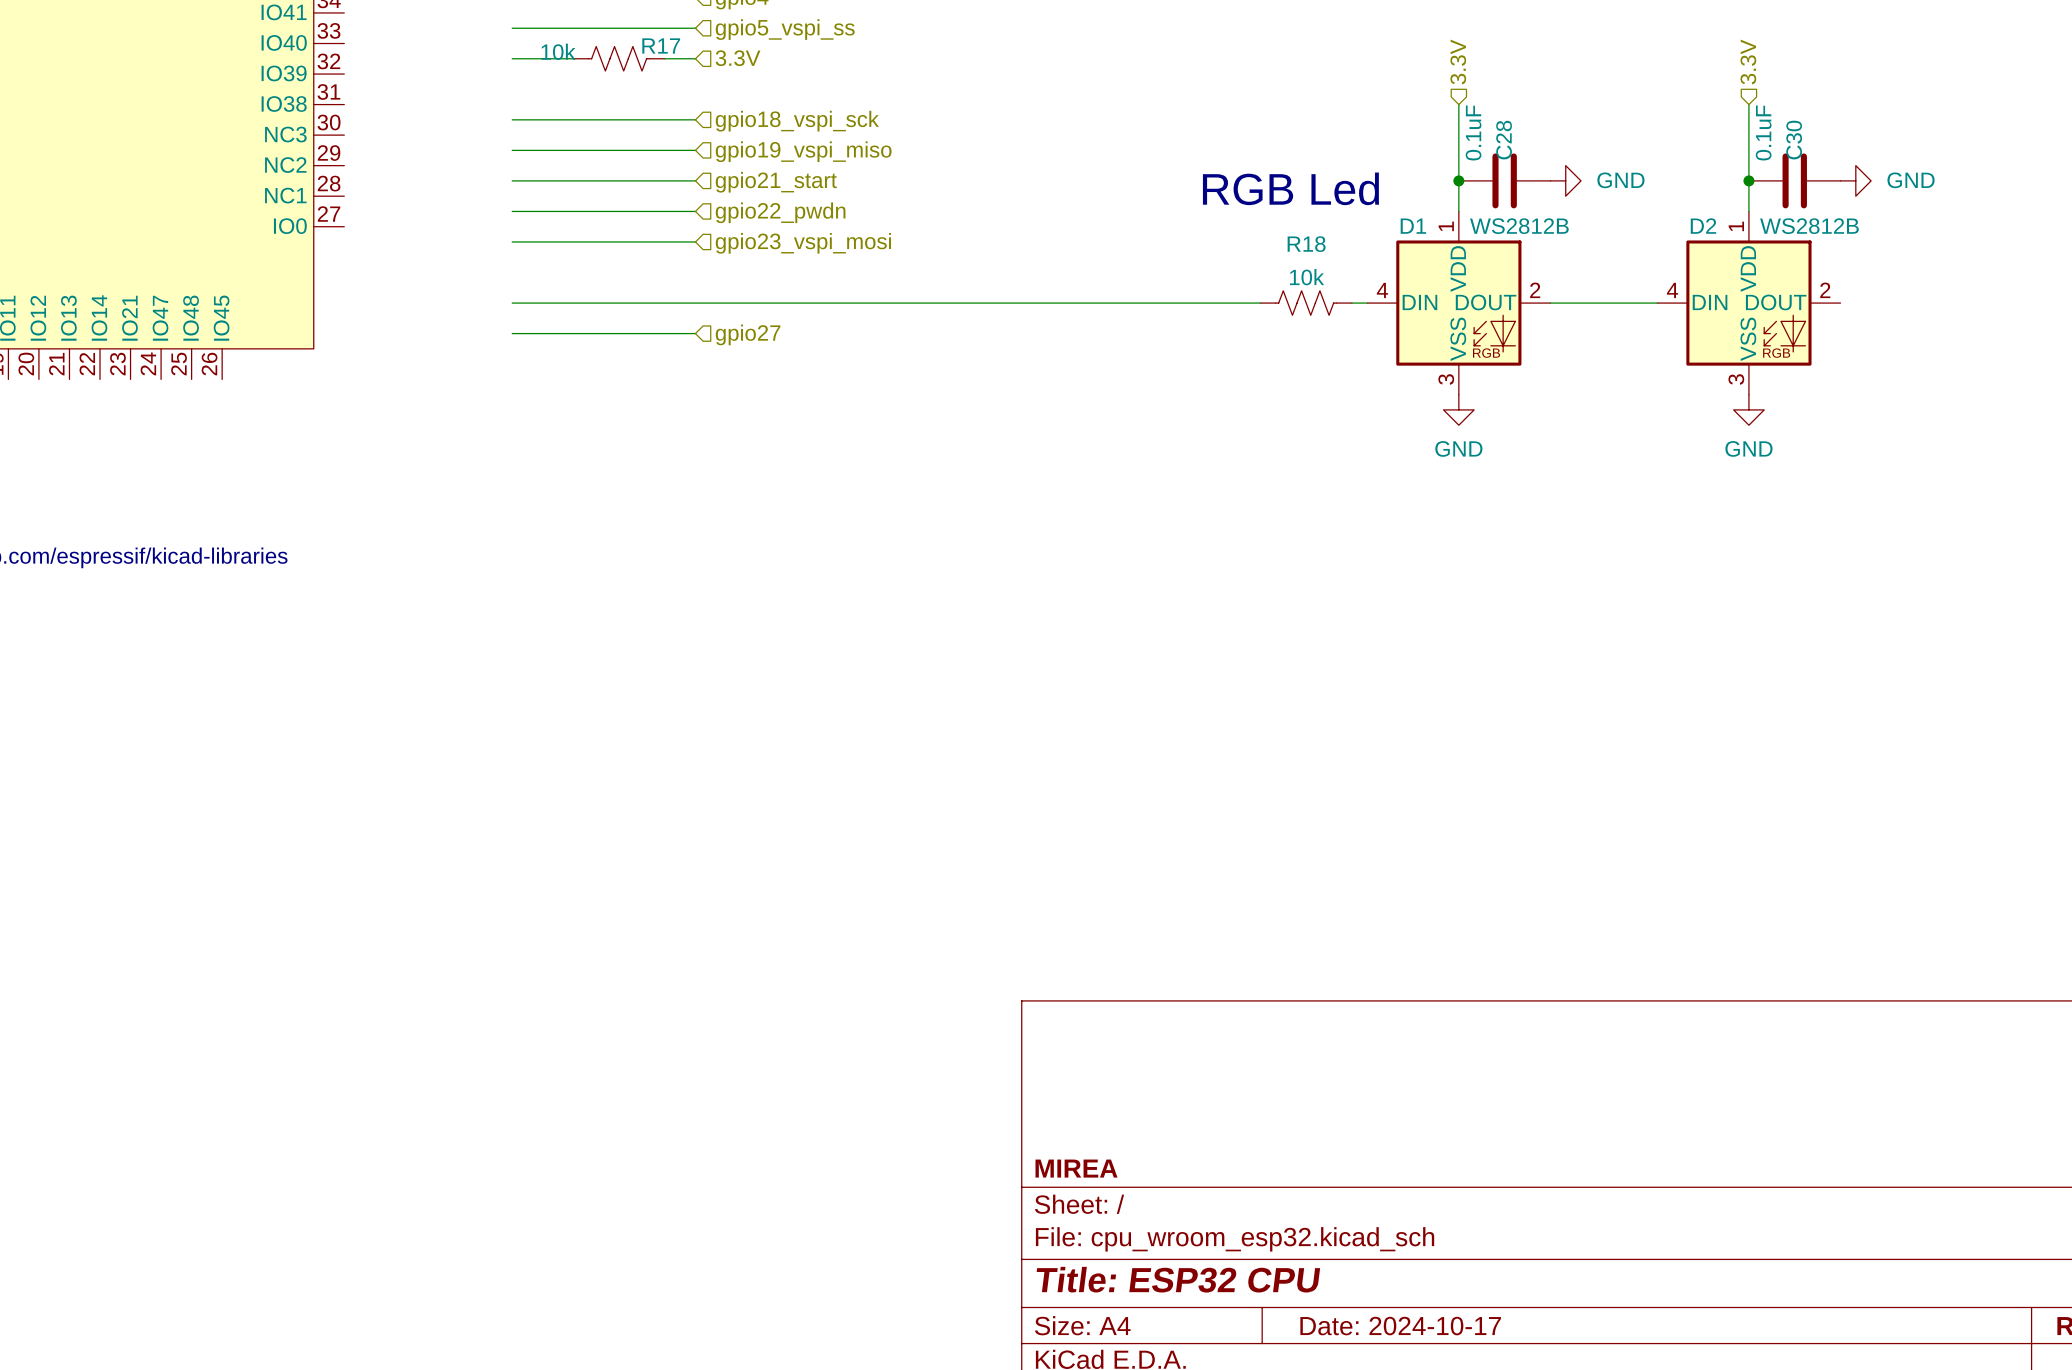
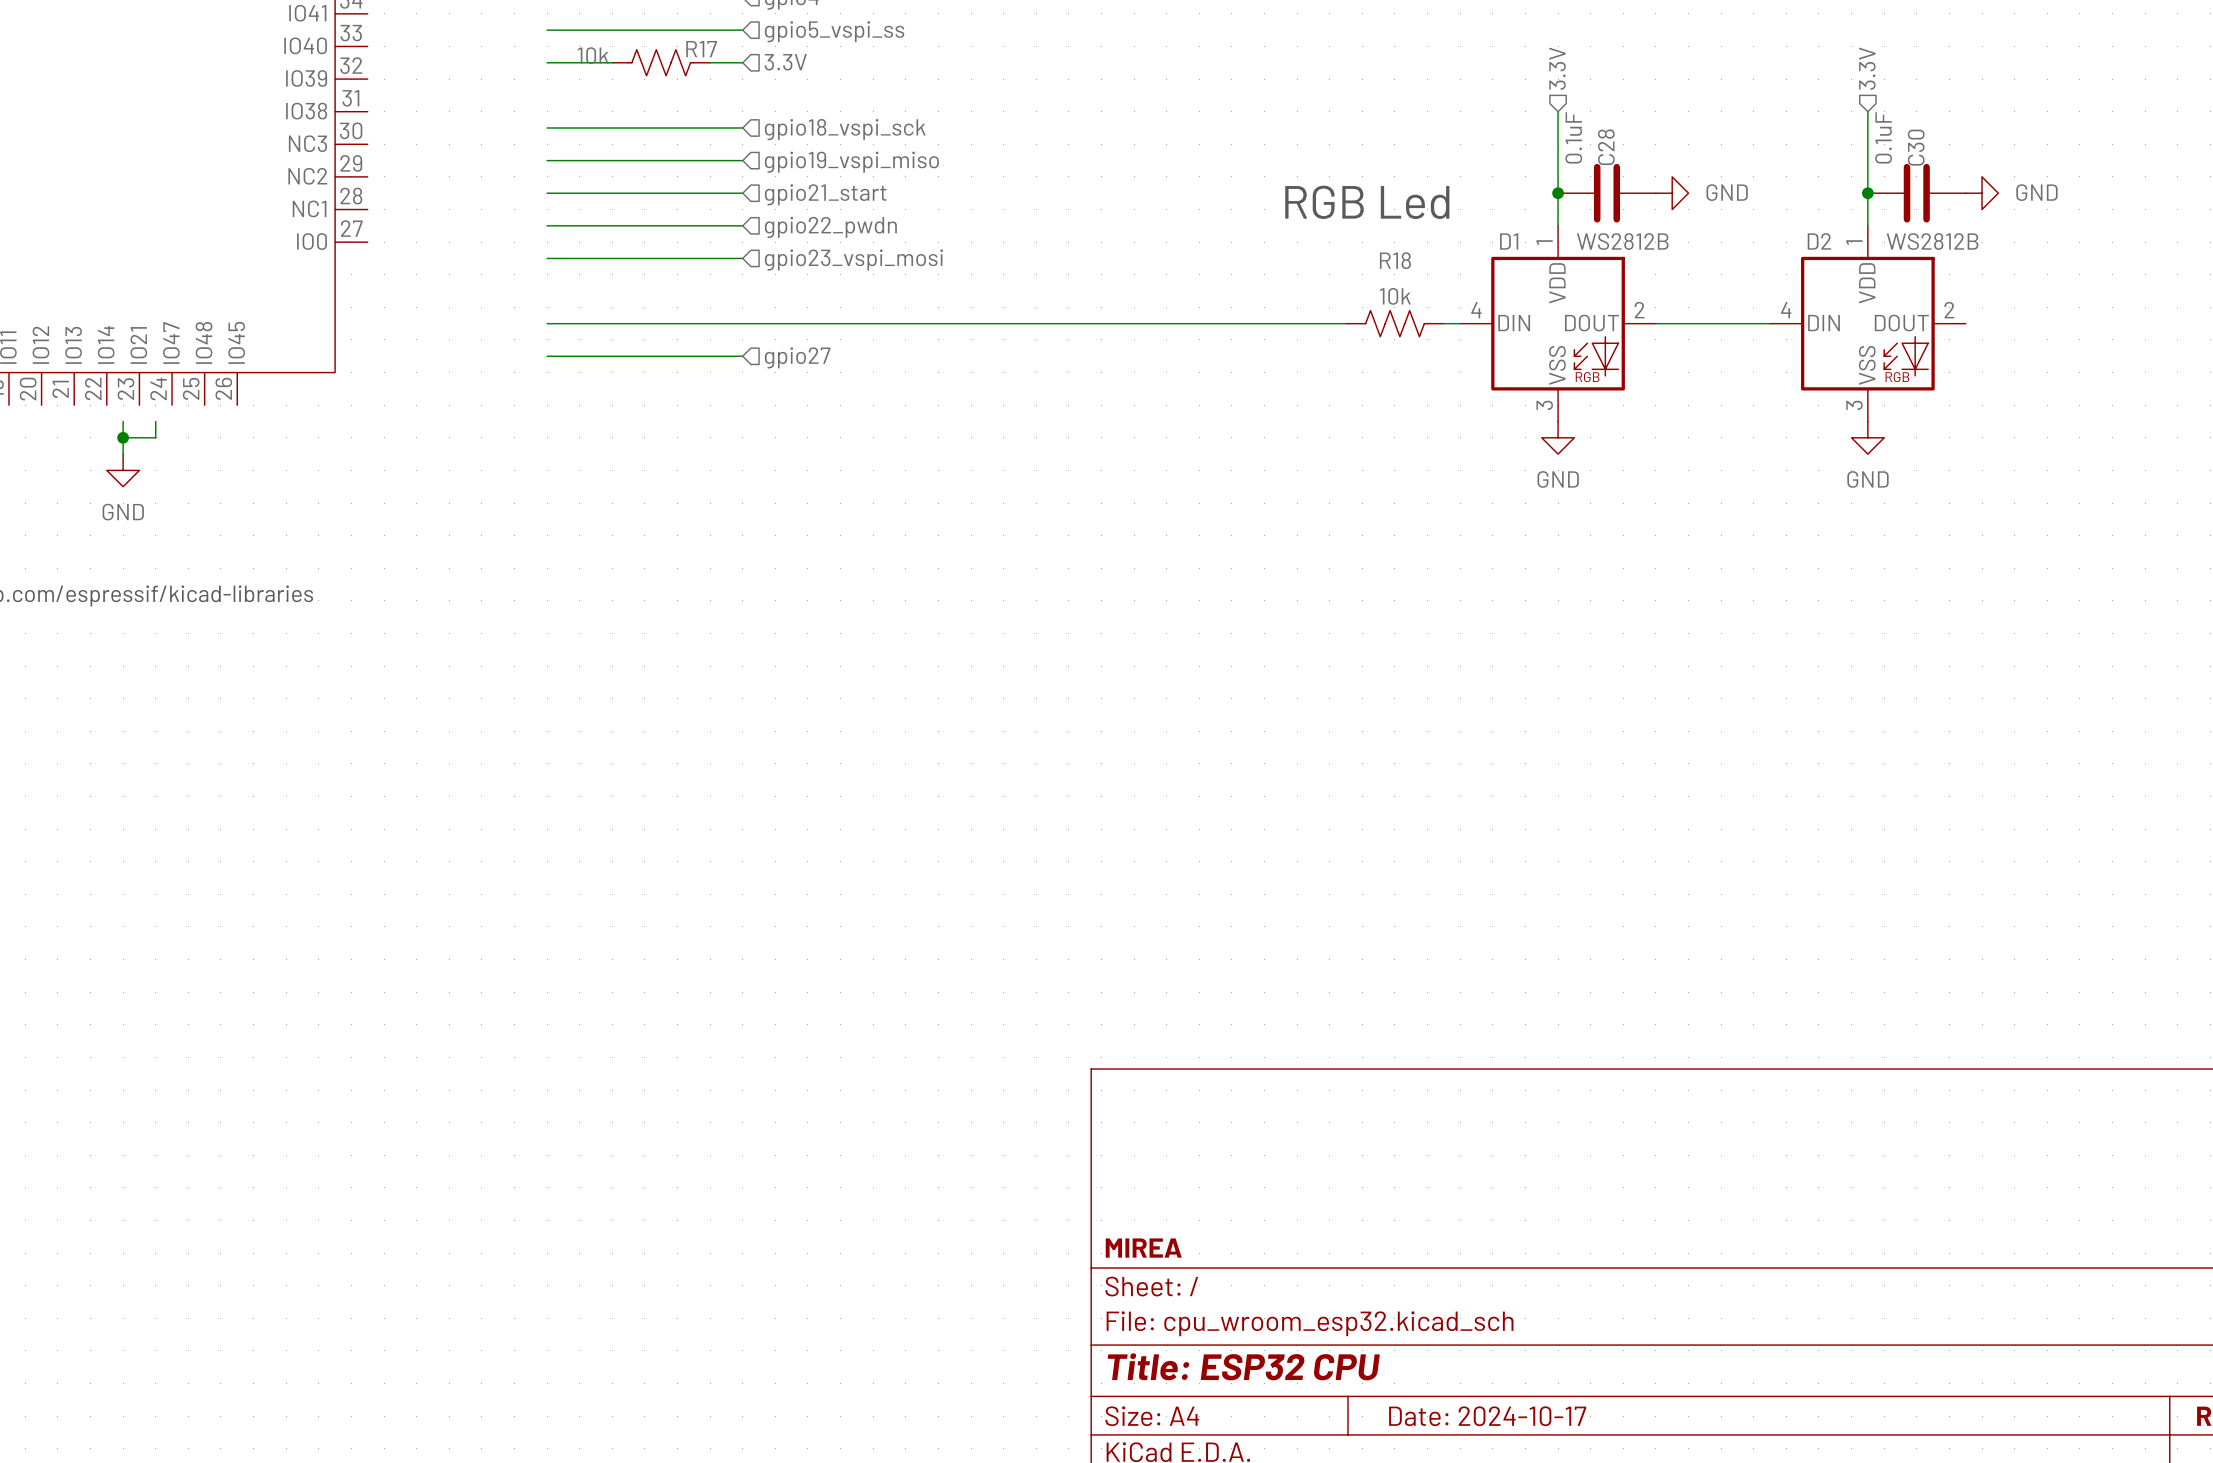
wire: none -> (123, 421) (123, 454)
wire: none -> (155, 421) (155, 437) (123, 437)
junction: none -> (123, 437)
power symbol: none -> GND (123, 470)

